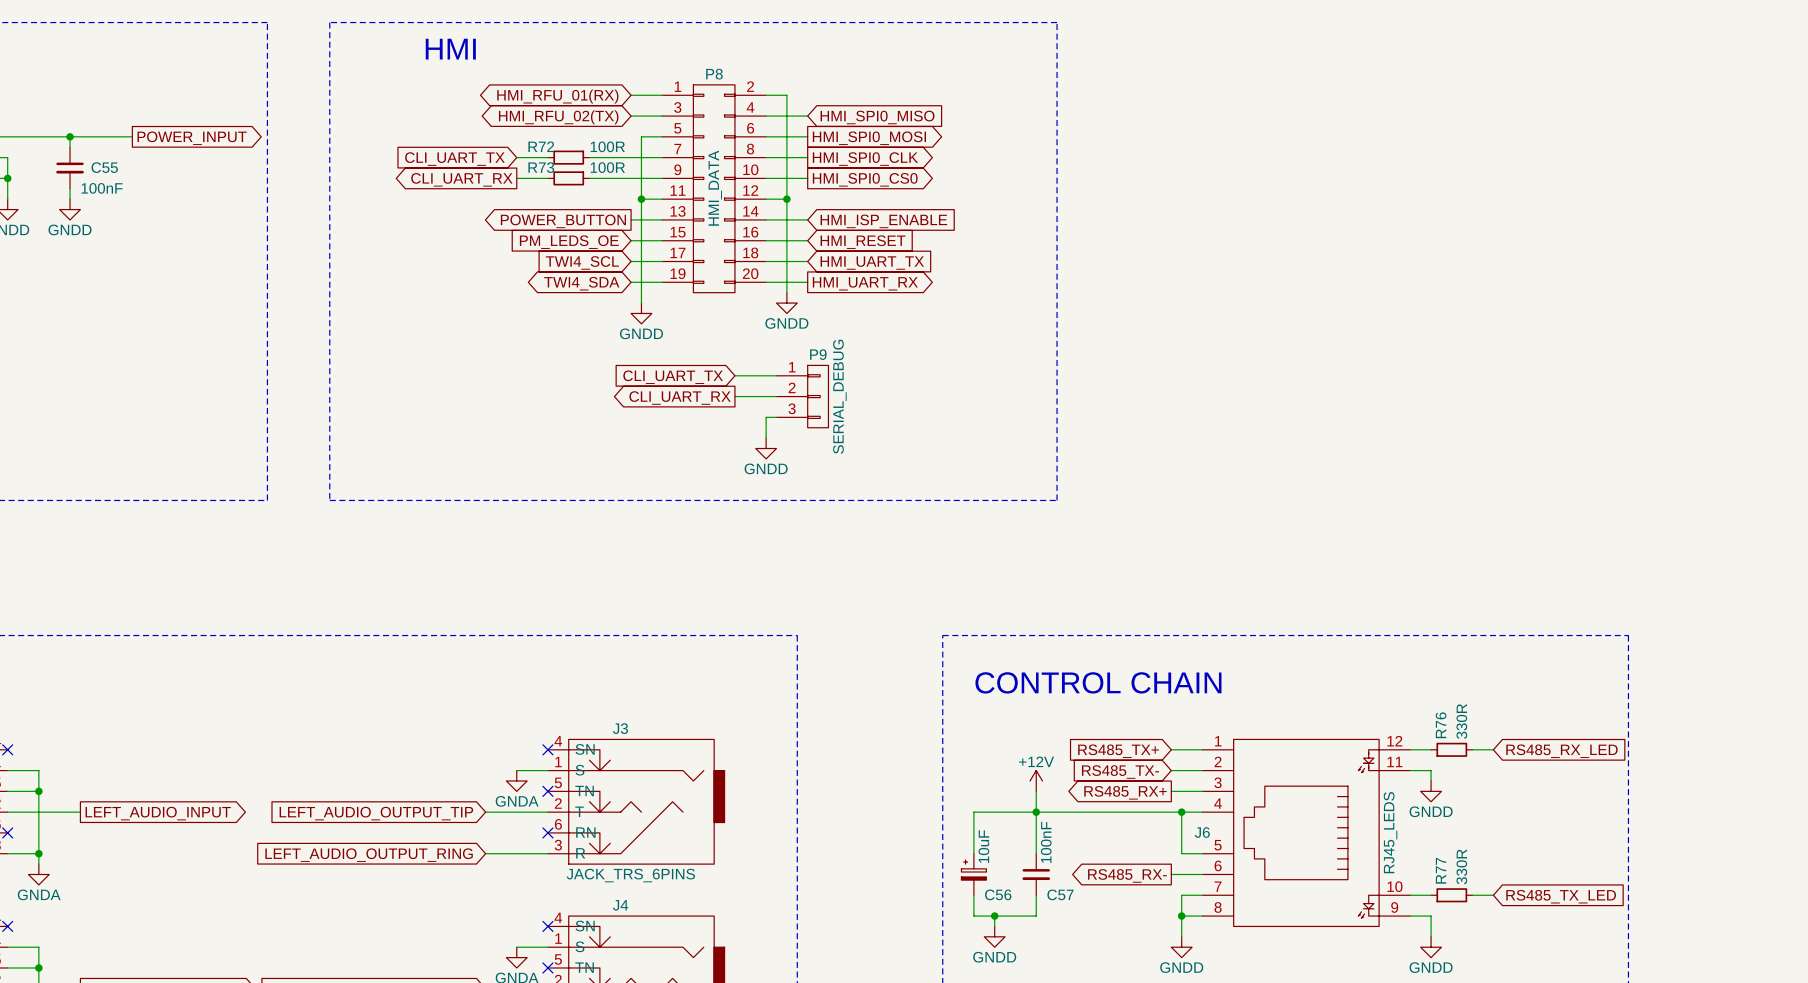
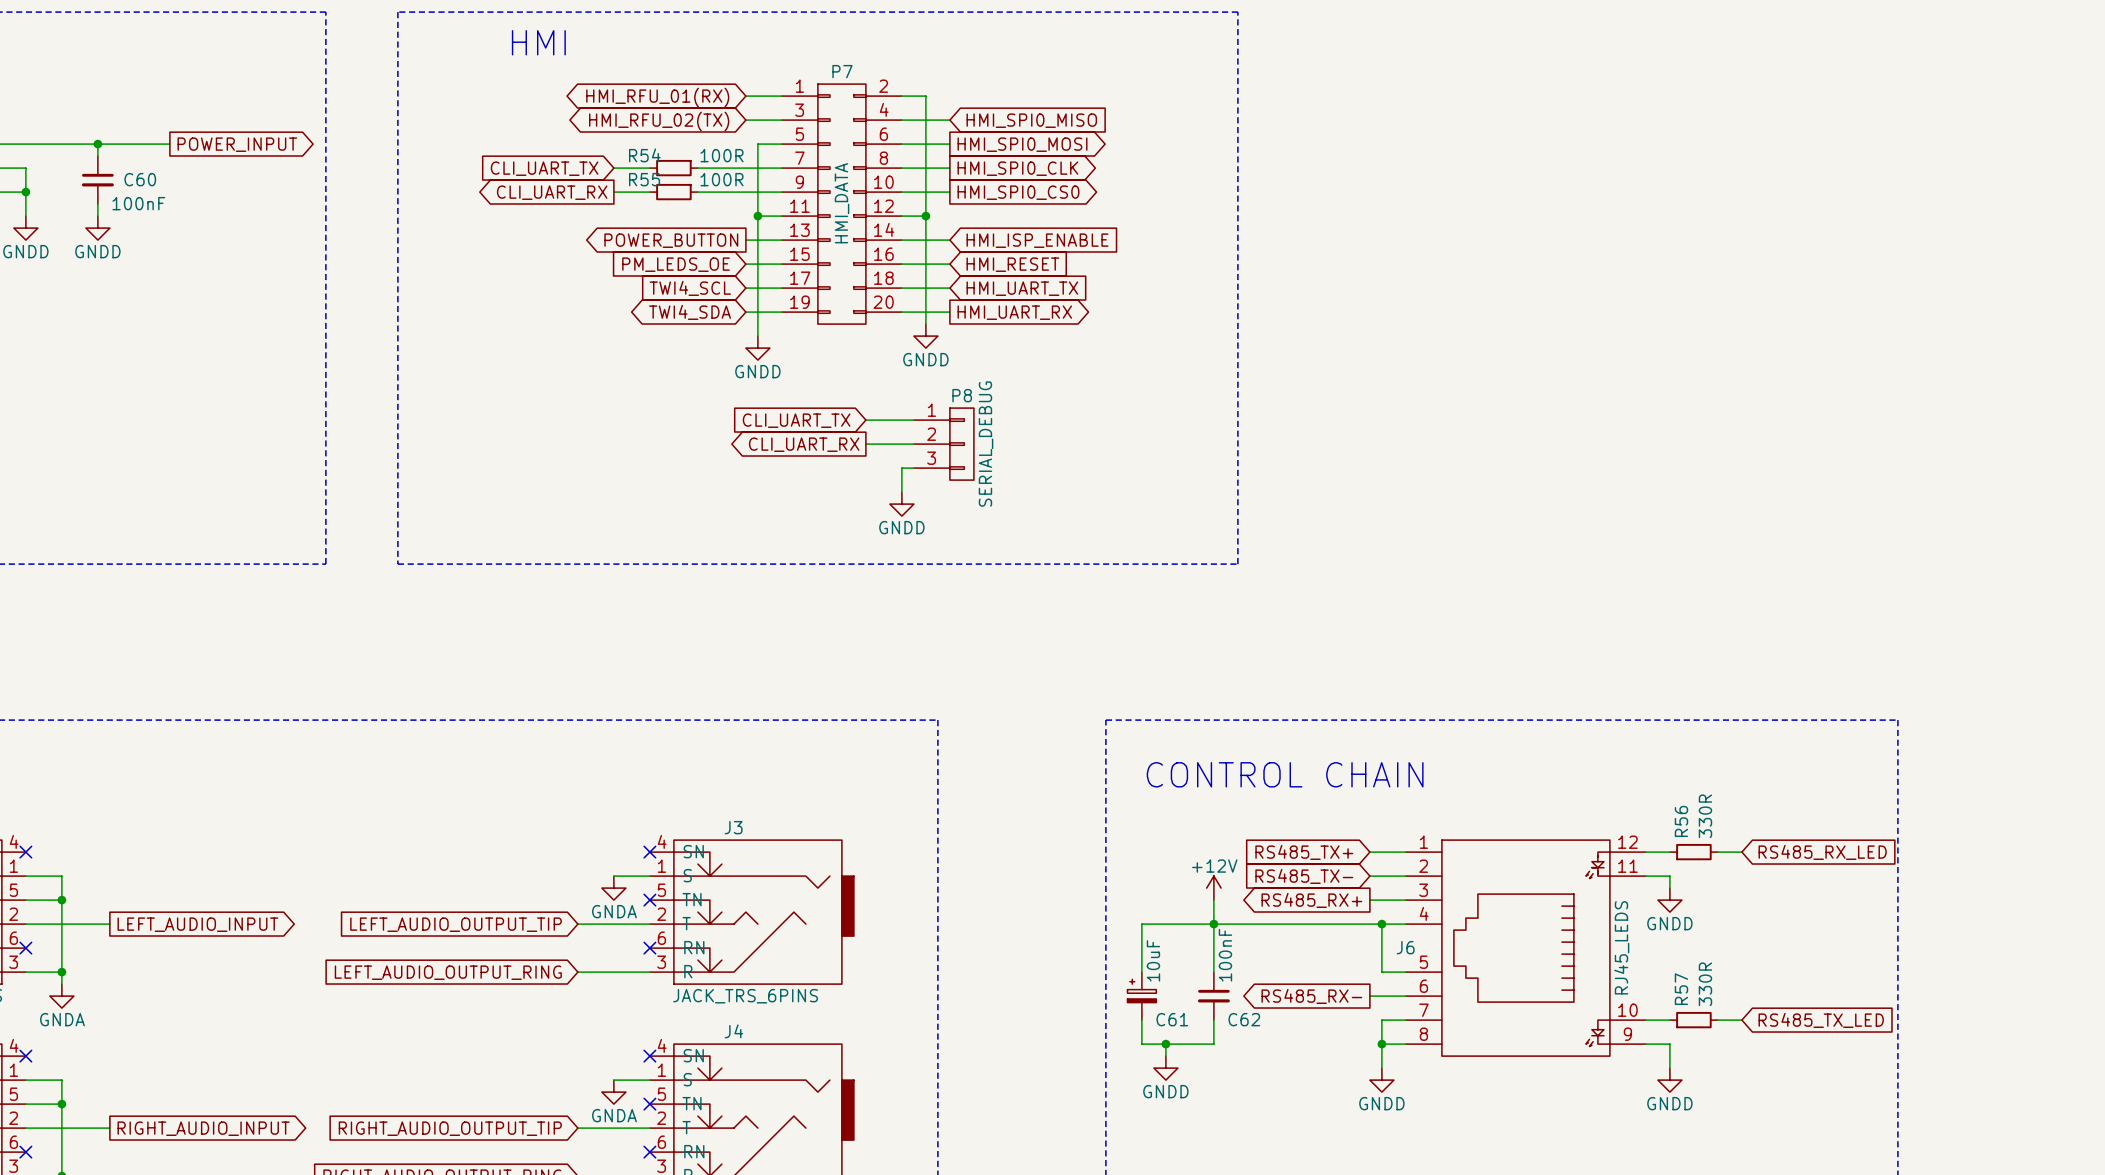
P8 name: P8 (714, 74) -> P7 (842, 71)
R72 name: R72 (541, 146) -> R54 (644, 155)
C55 name: C55 (104, 167) -> C60 (140, 179)
R73 name: R73 (541, 167) -> R55 (644, 179)
P9 name: P9 (818, 354) -> P8 (962, 395)
R76 name: R76 (1441, 725) -> R56 (1681, 821)
R77 name: R77 (1441, 870) -> R57 (1681, 989)
C56 name: C56 (998, 894) -> C61 (1172, 1019)
C57 name: C57 (1060, 894) -> C62 (1244, 1019)

